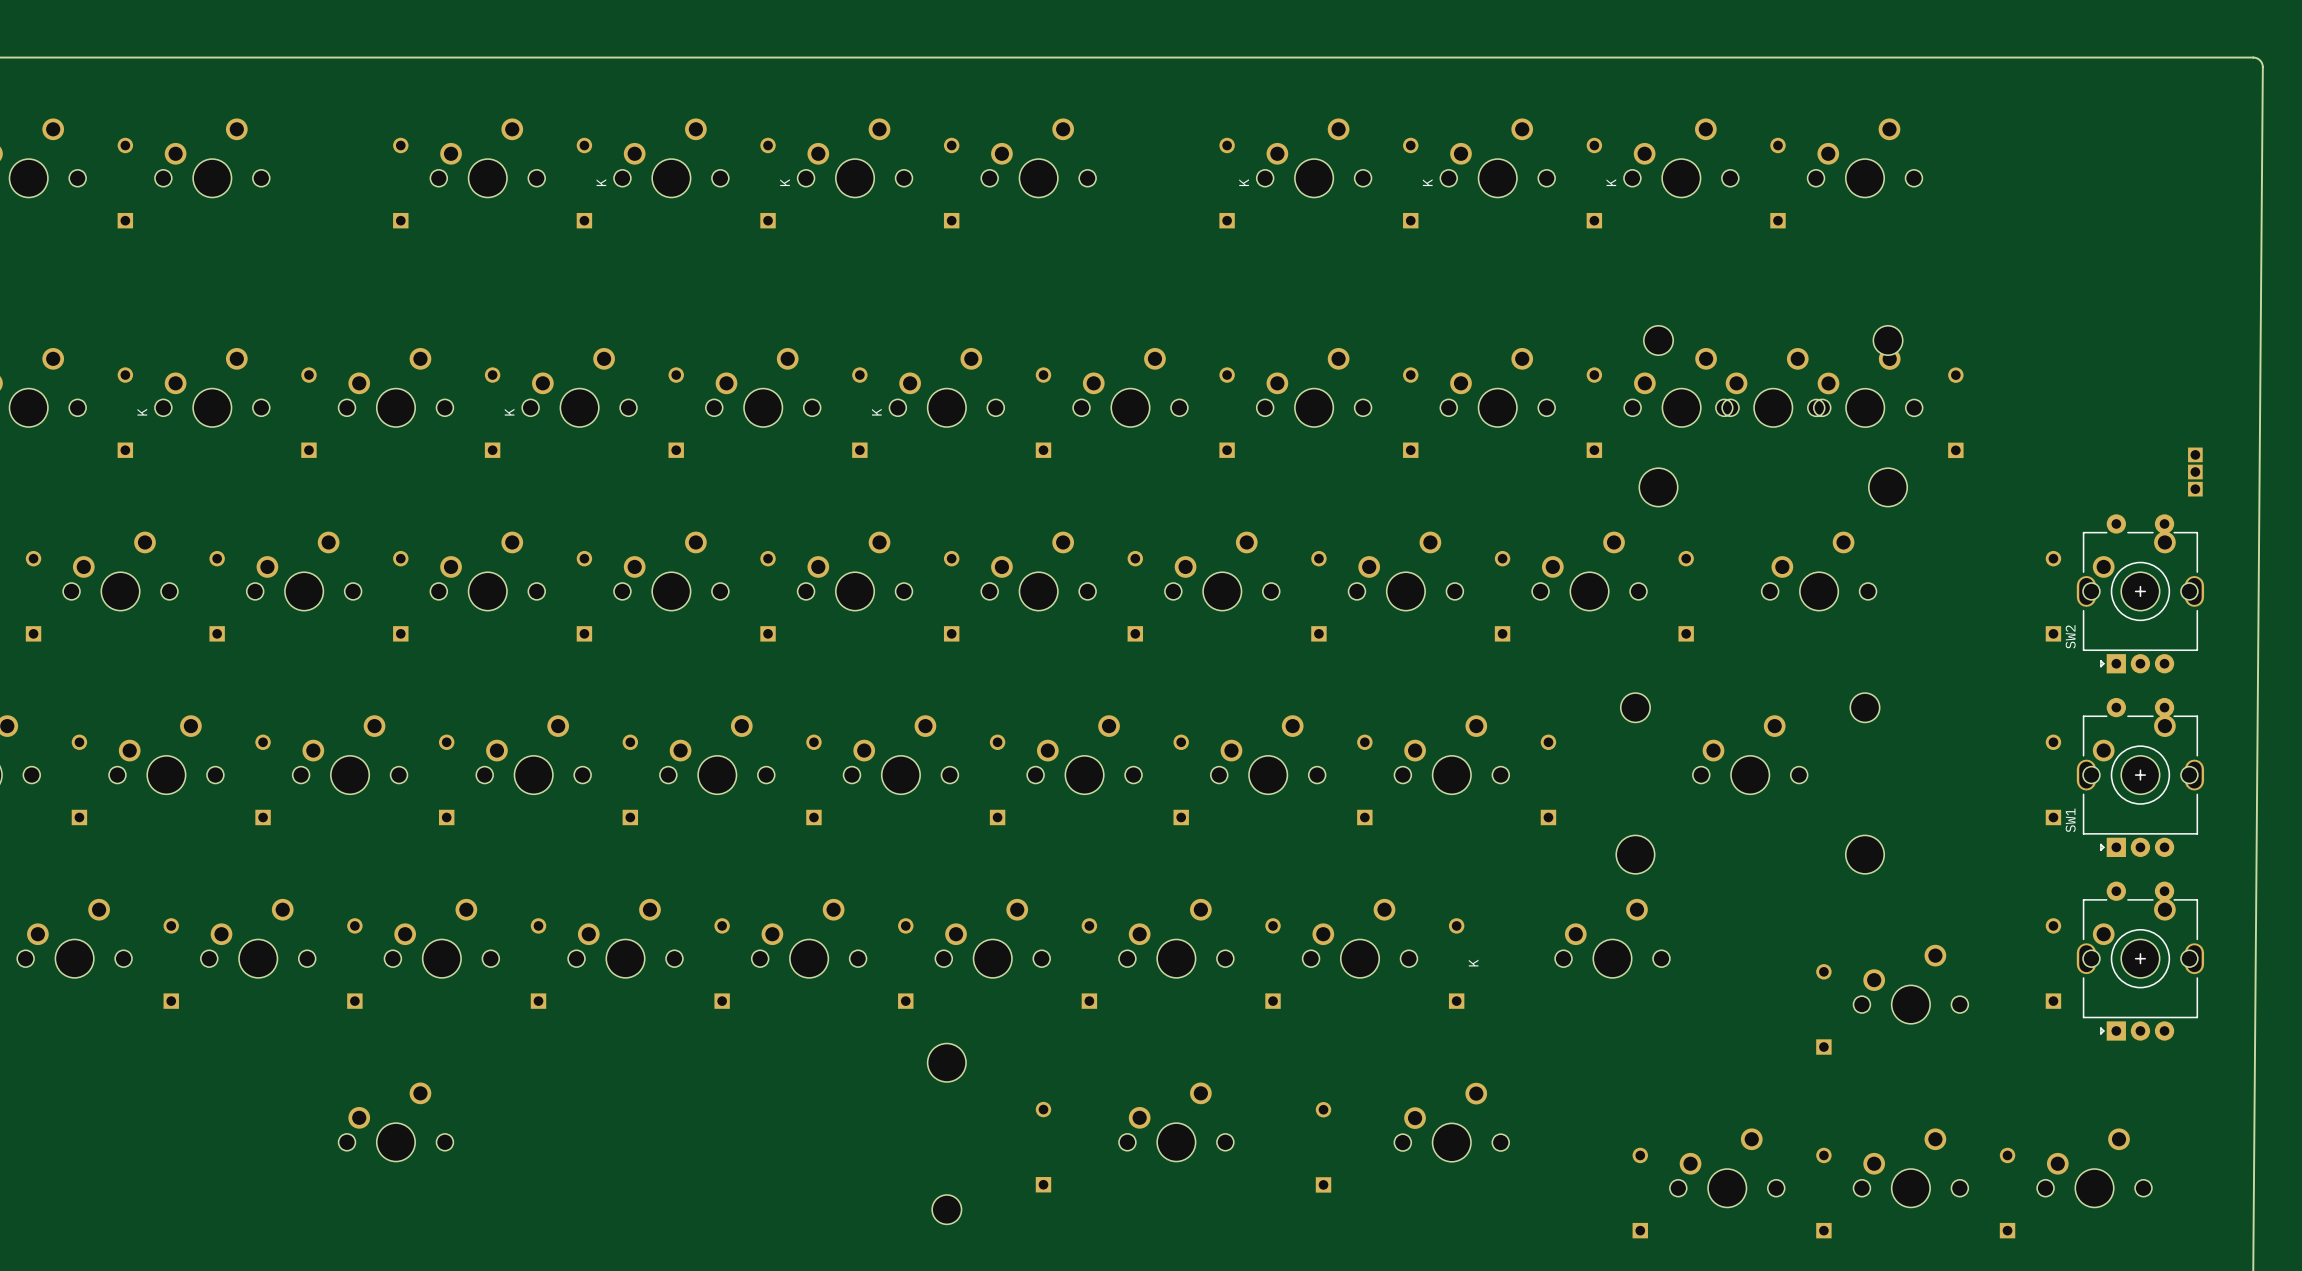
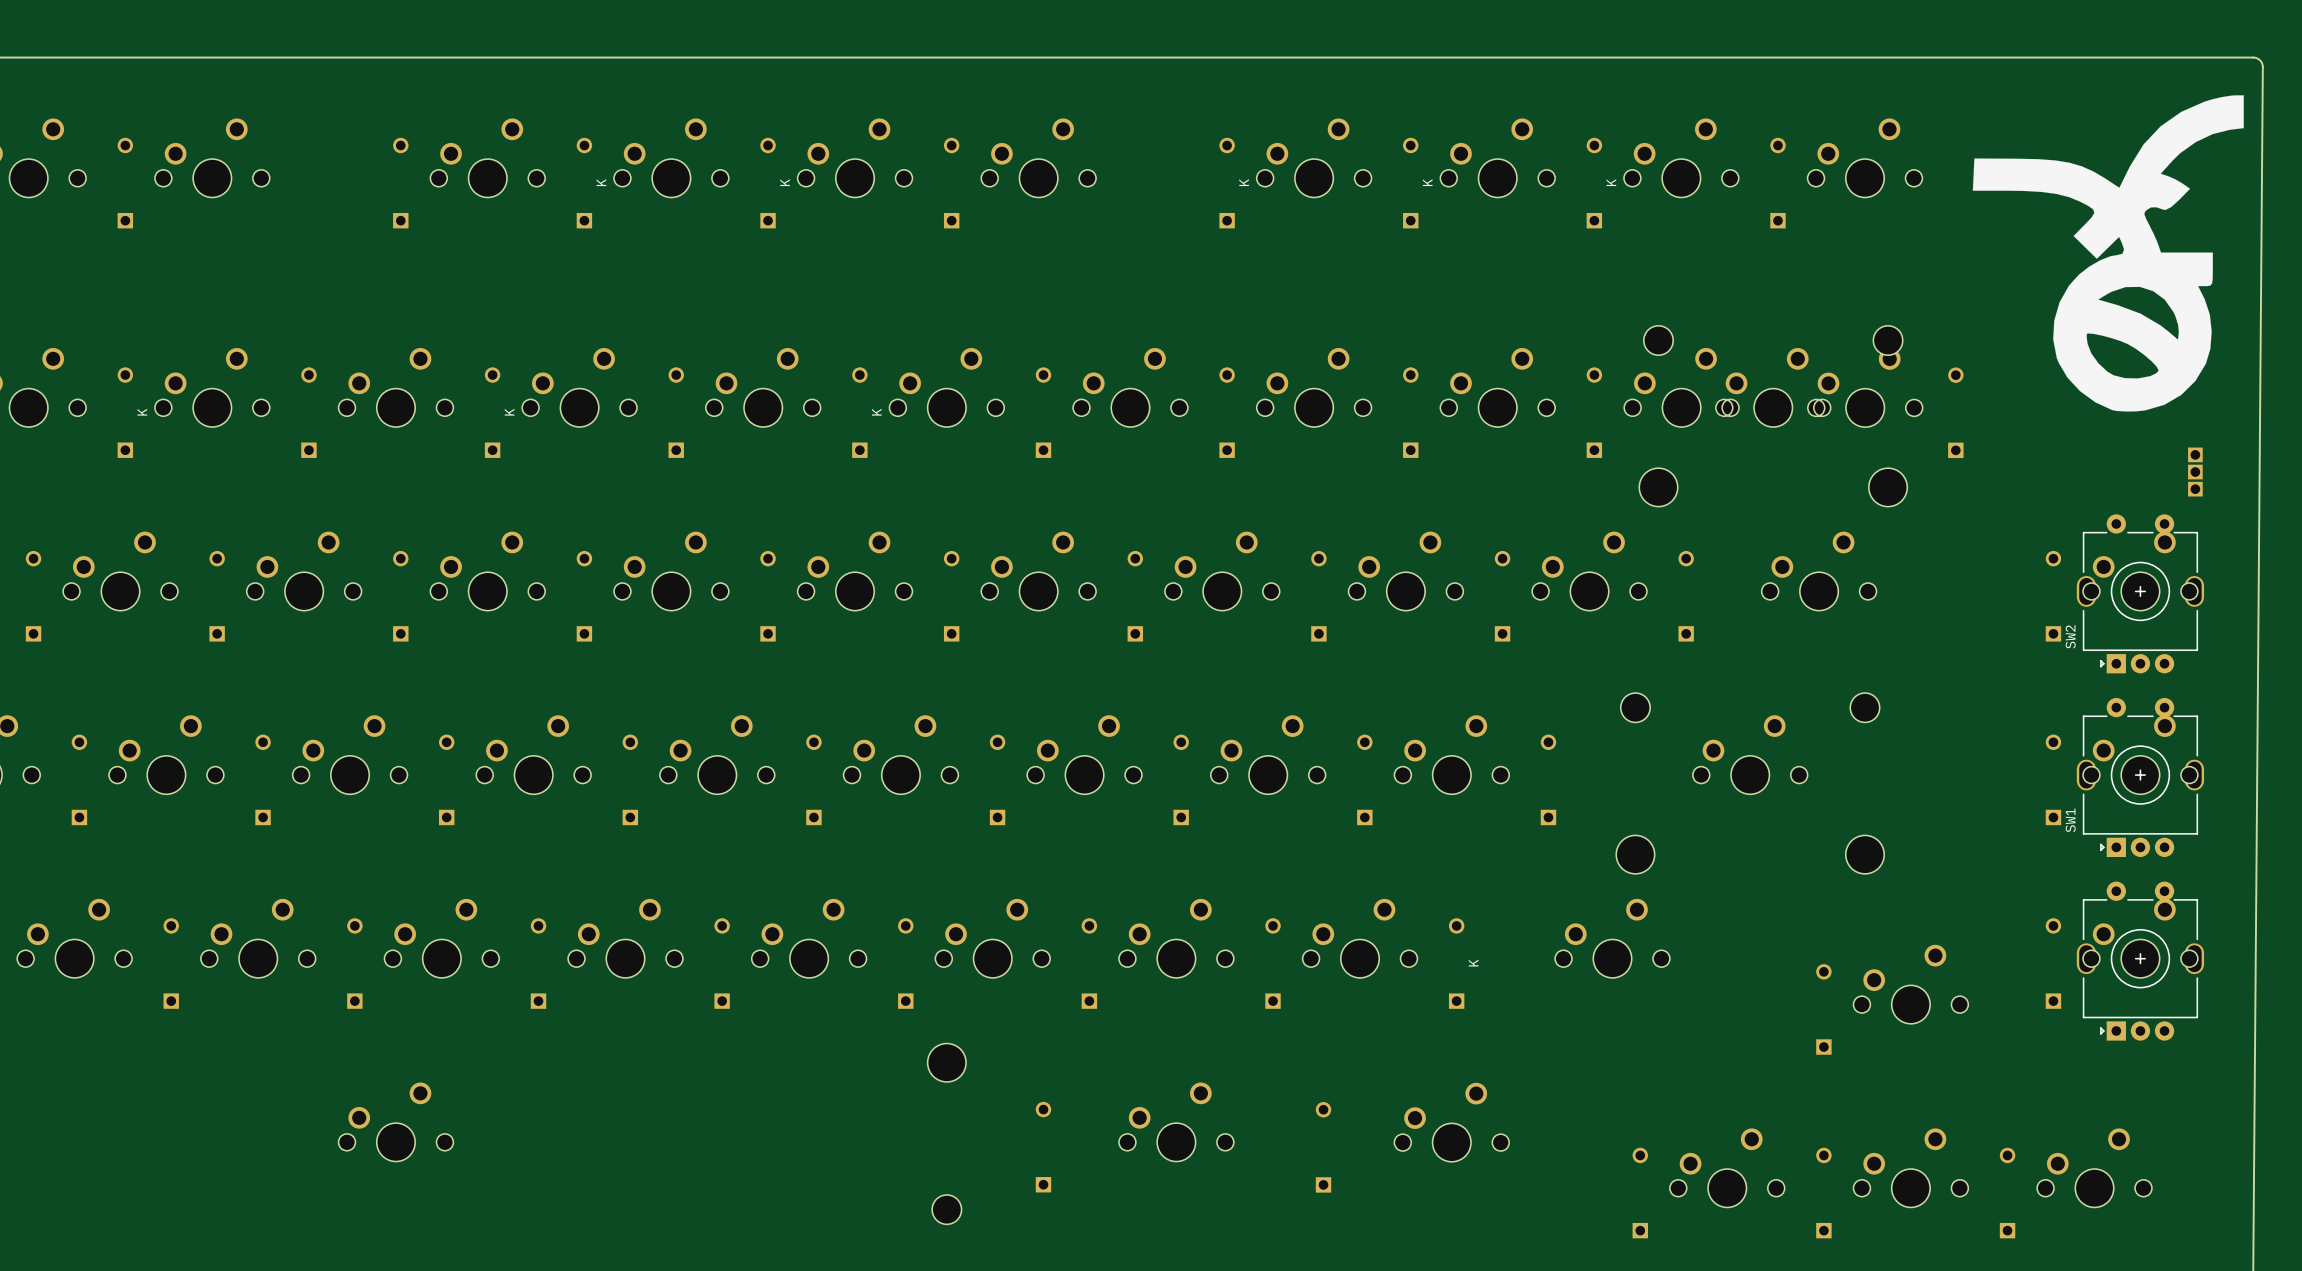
drawing: none -> [1972, 95, 2244, 412]

